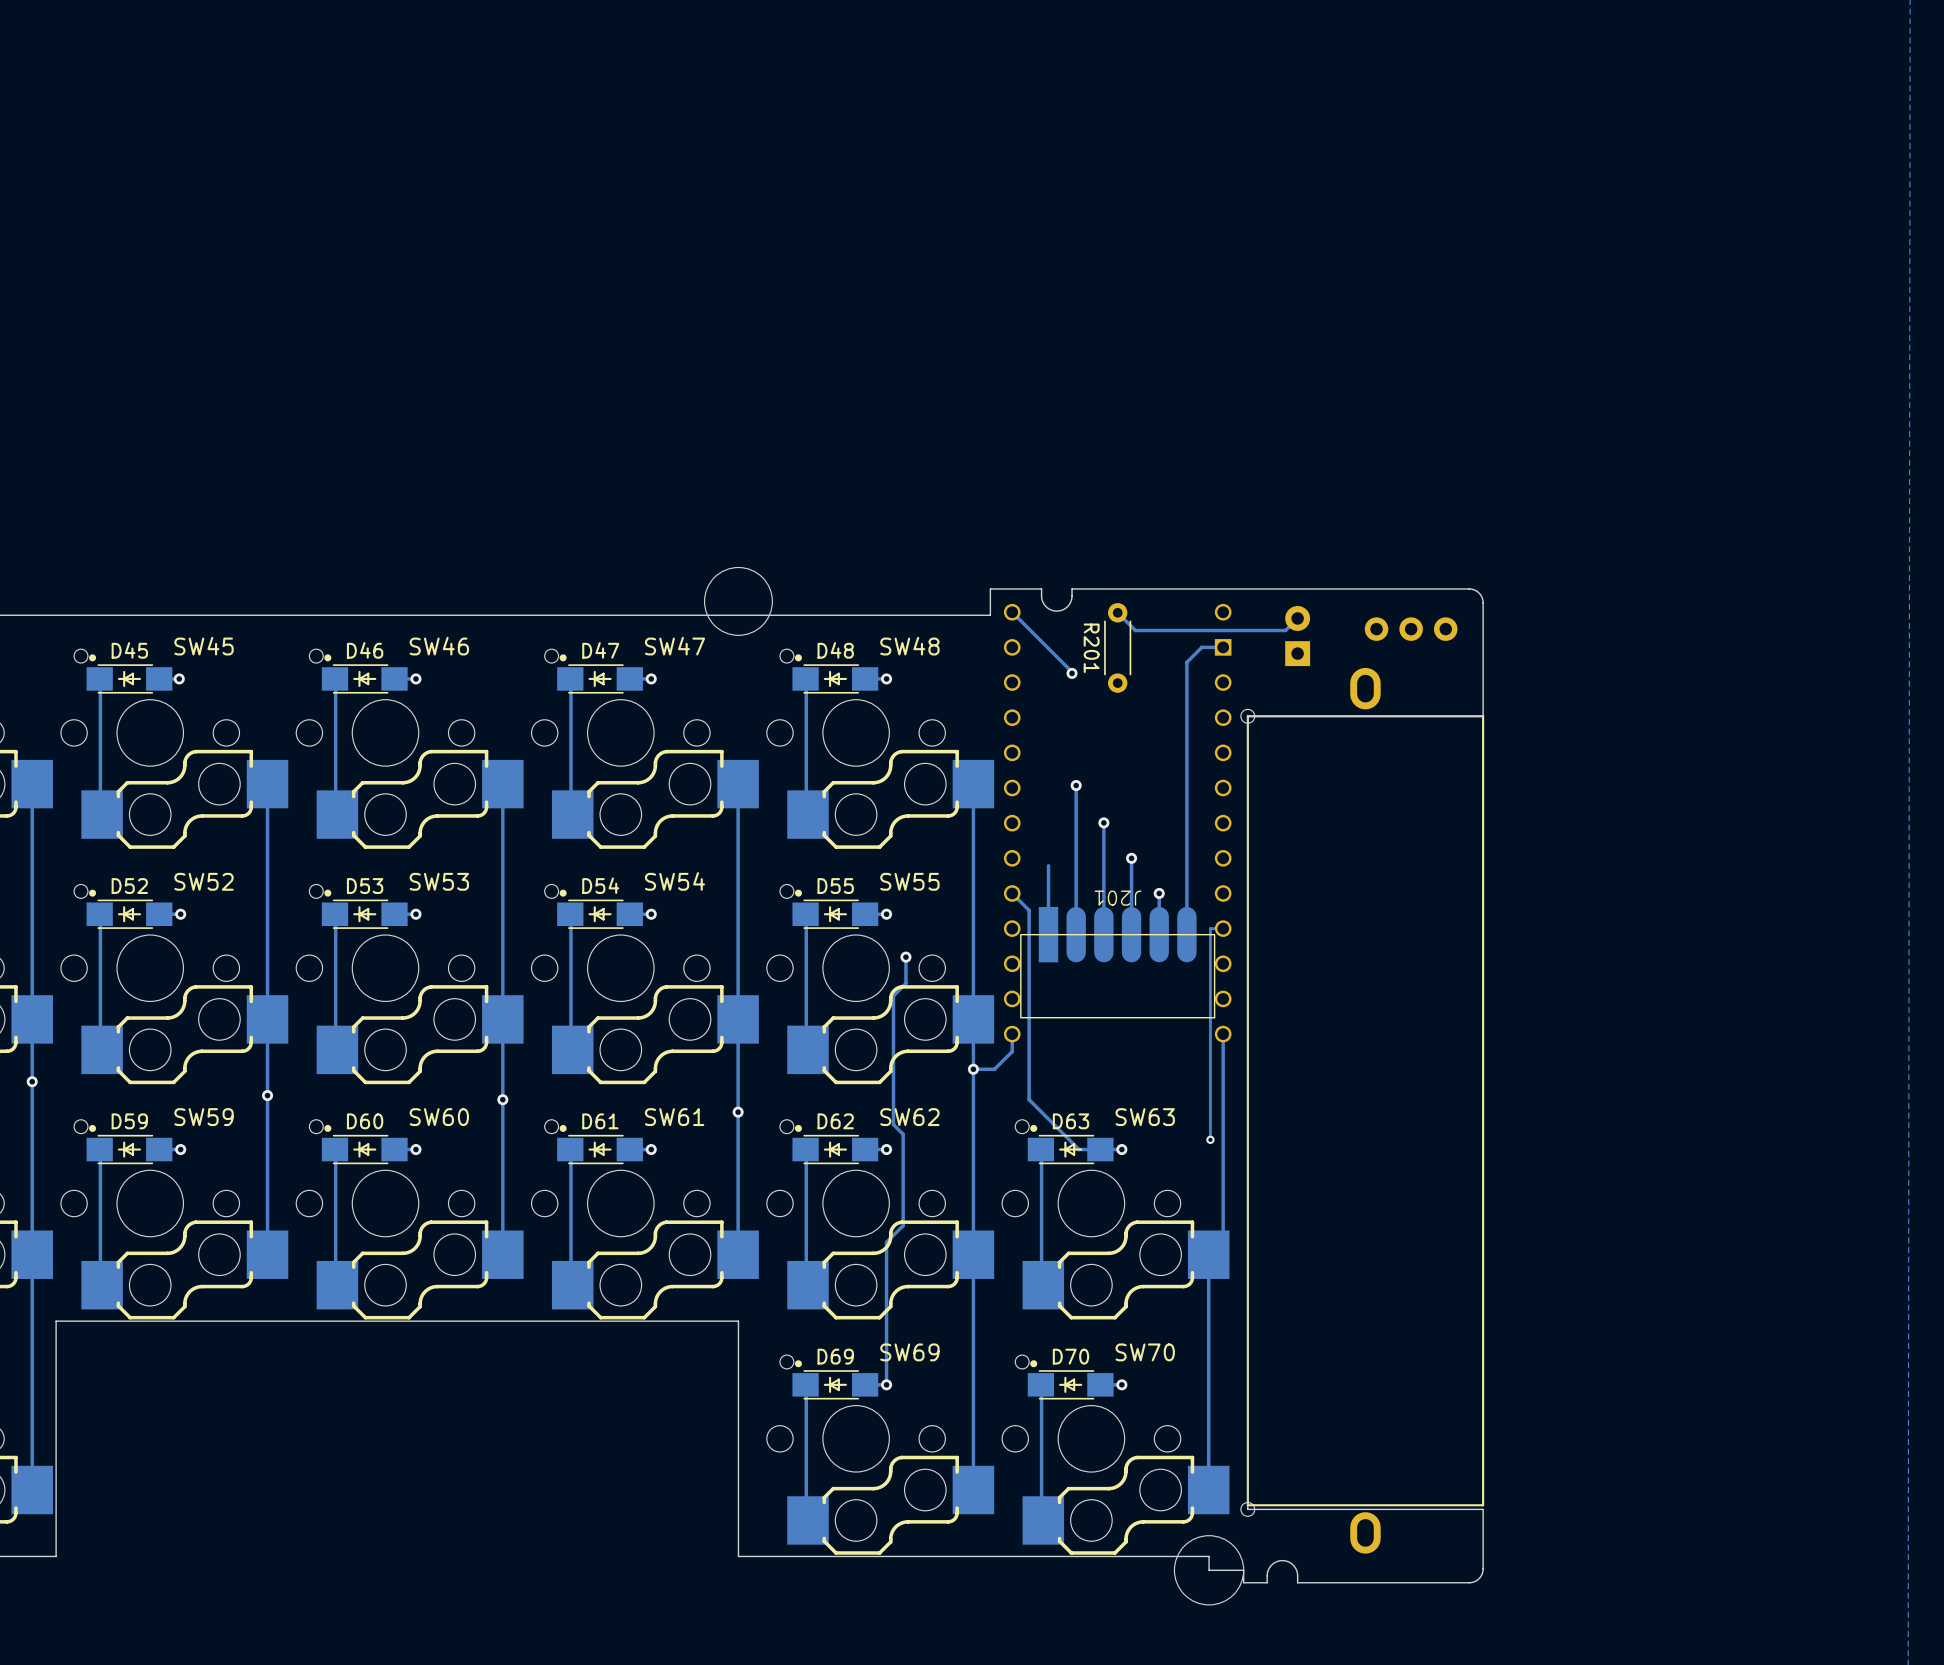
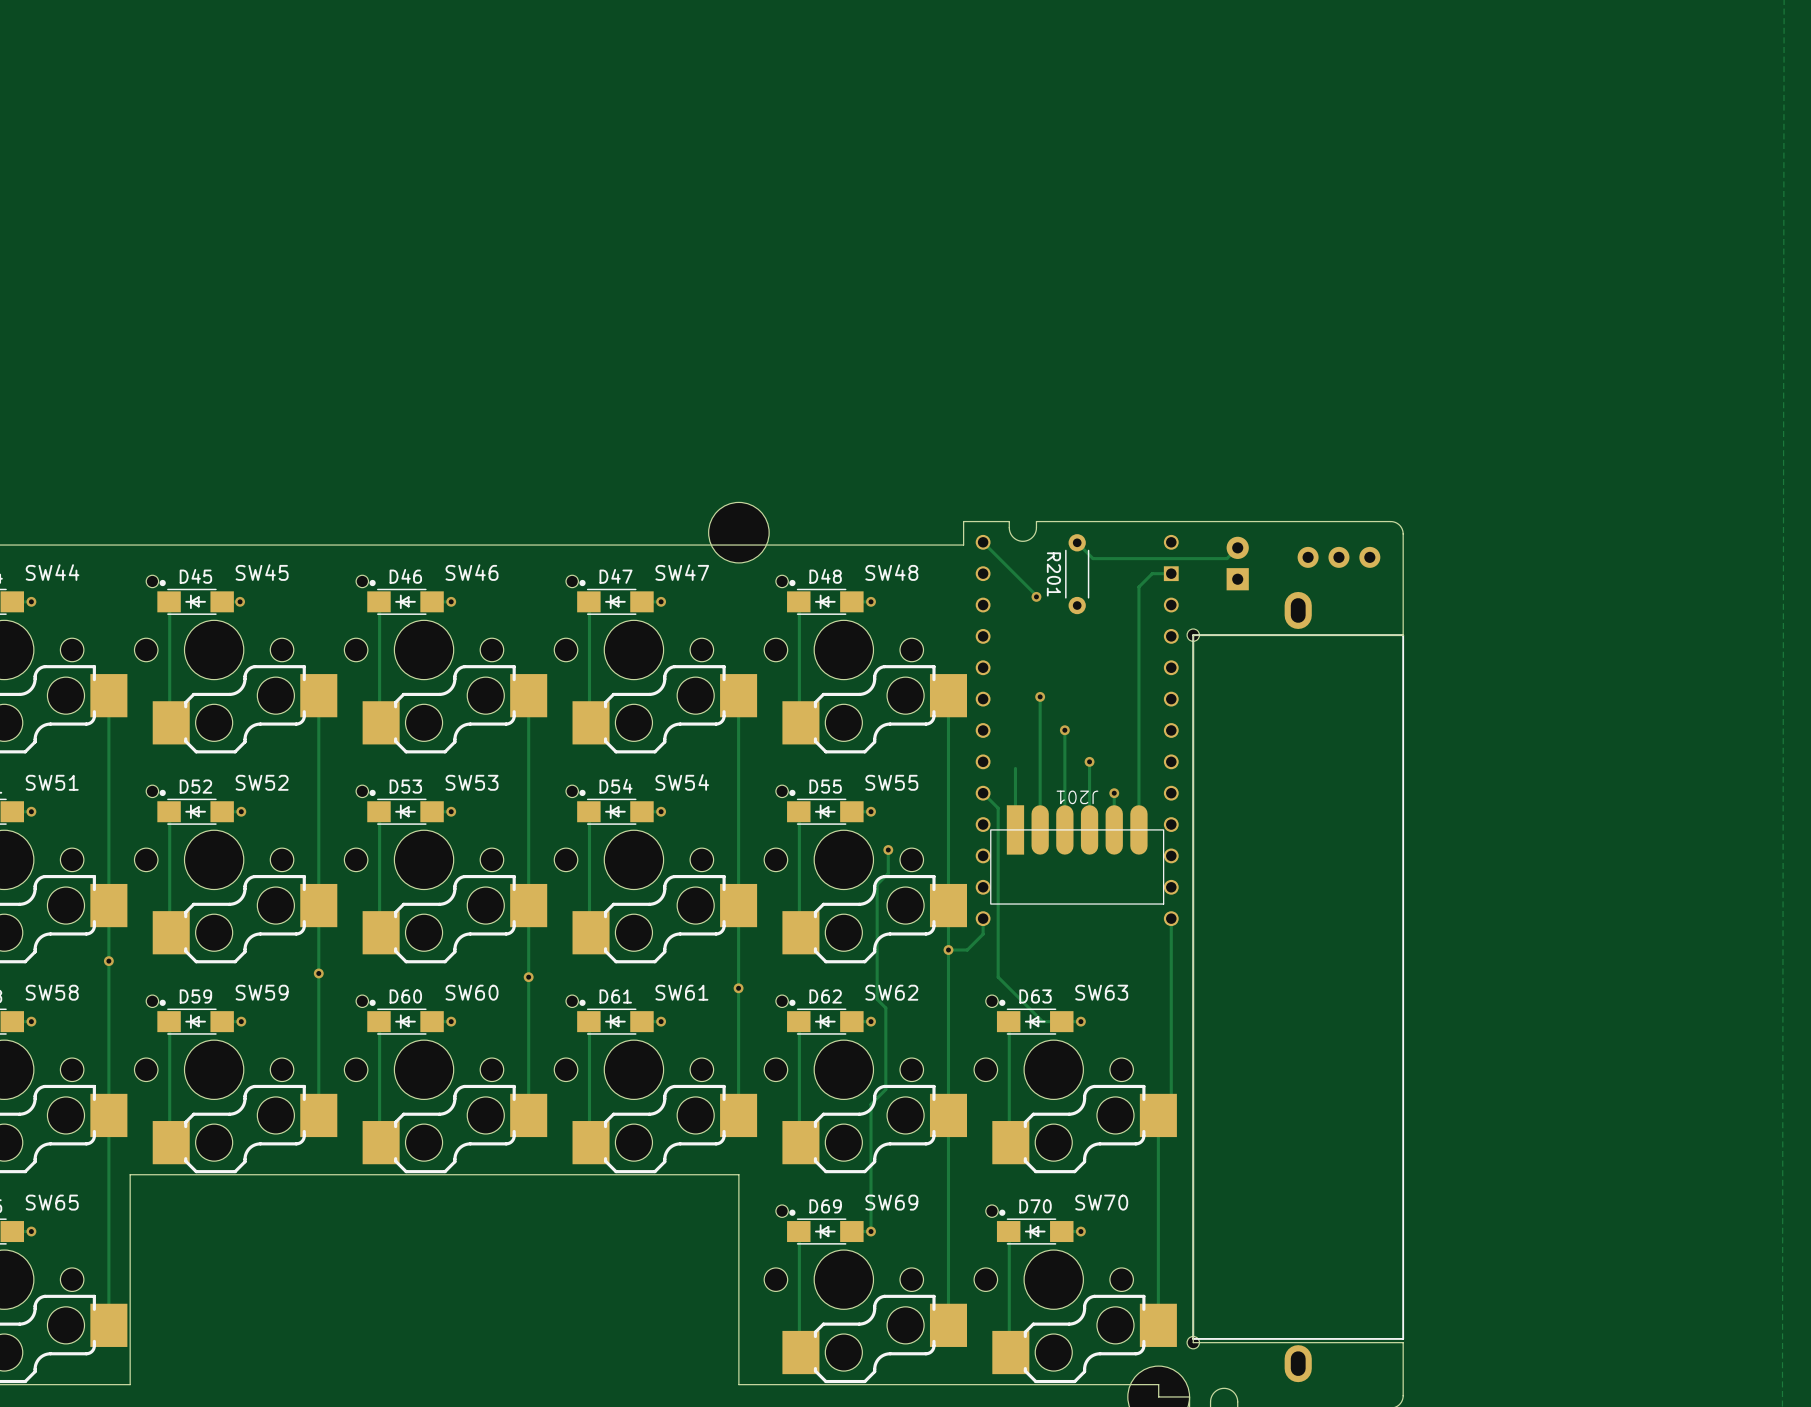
track: (1223, 928) (1210, 928) (1210, 1139) -> none
via: (1210, 1139) -> none

